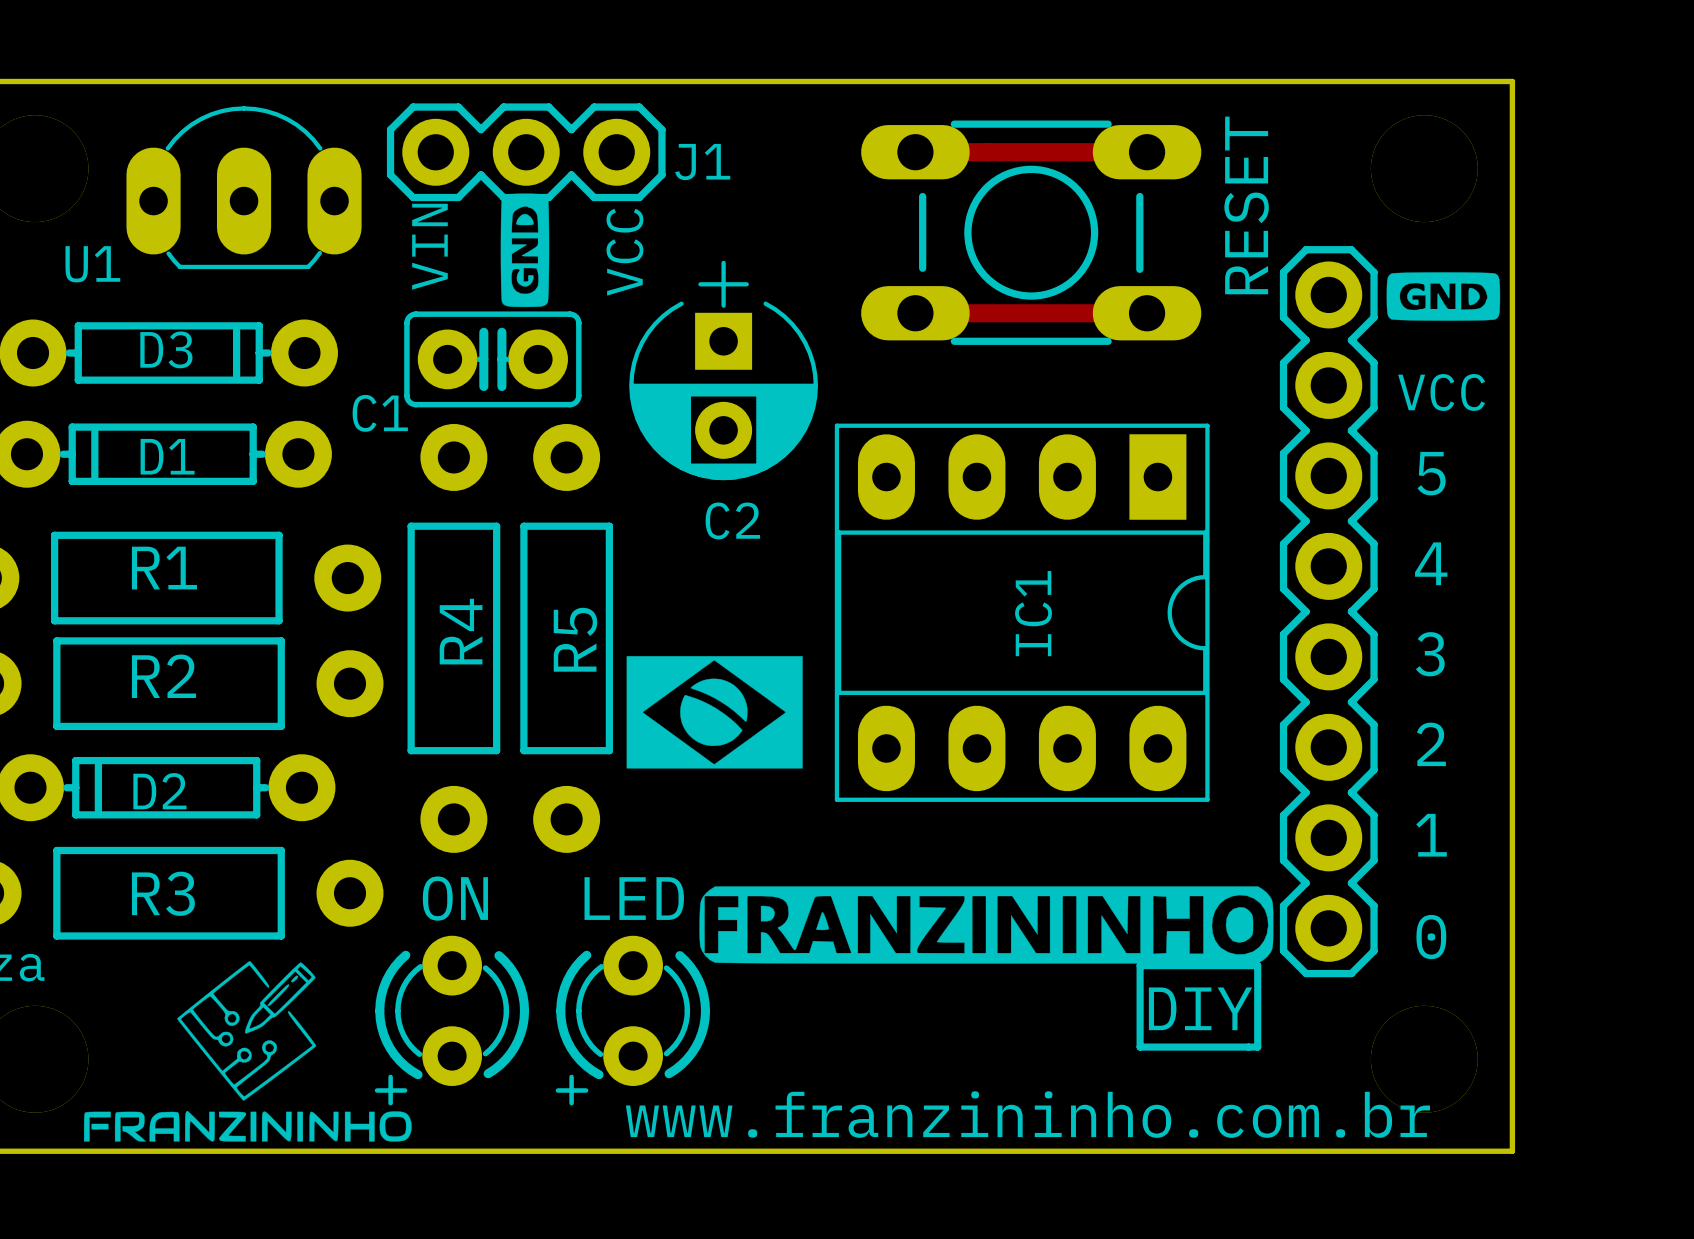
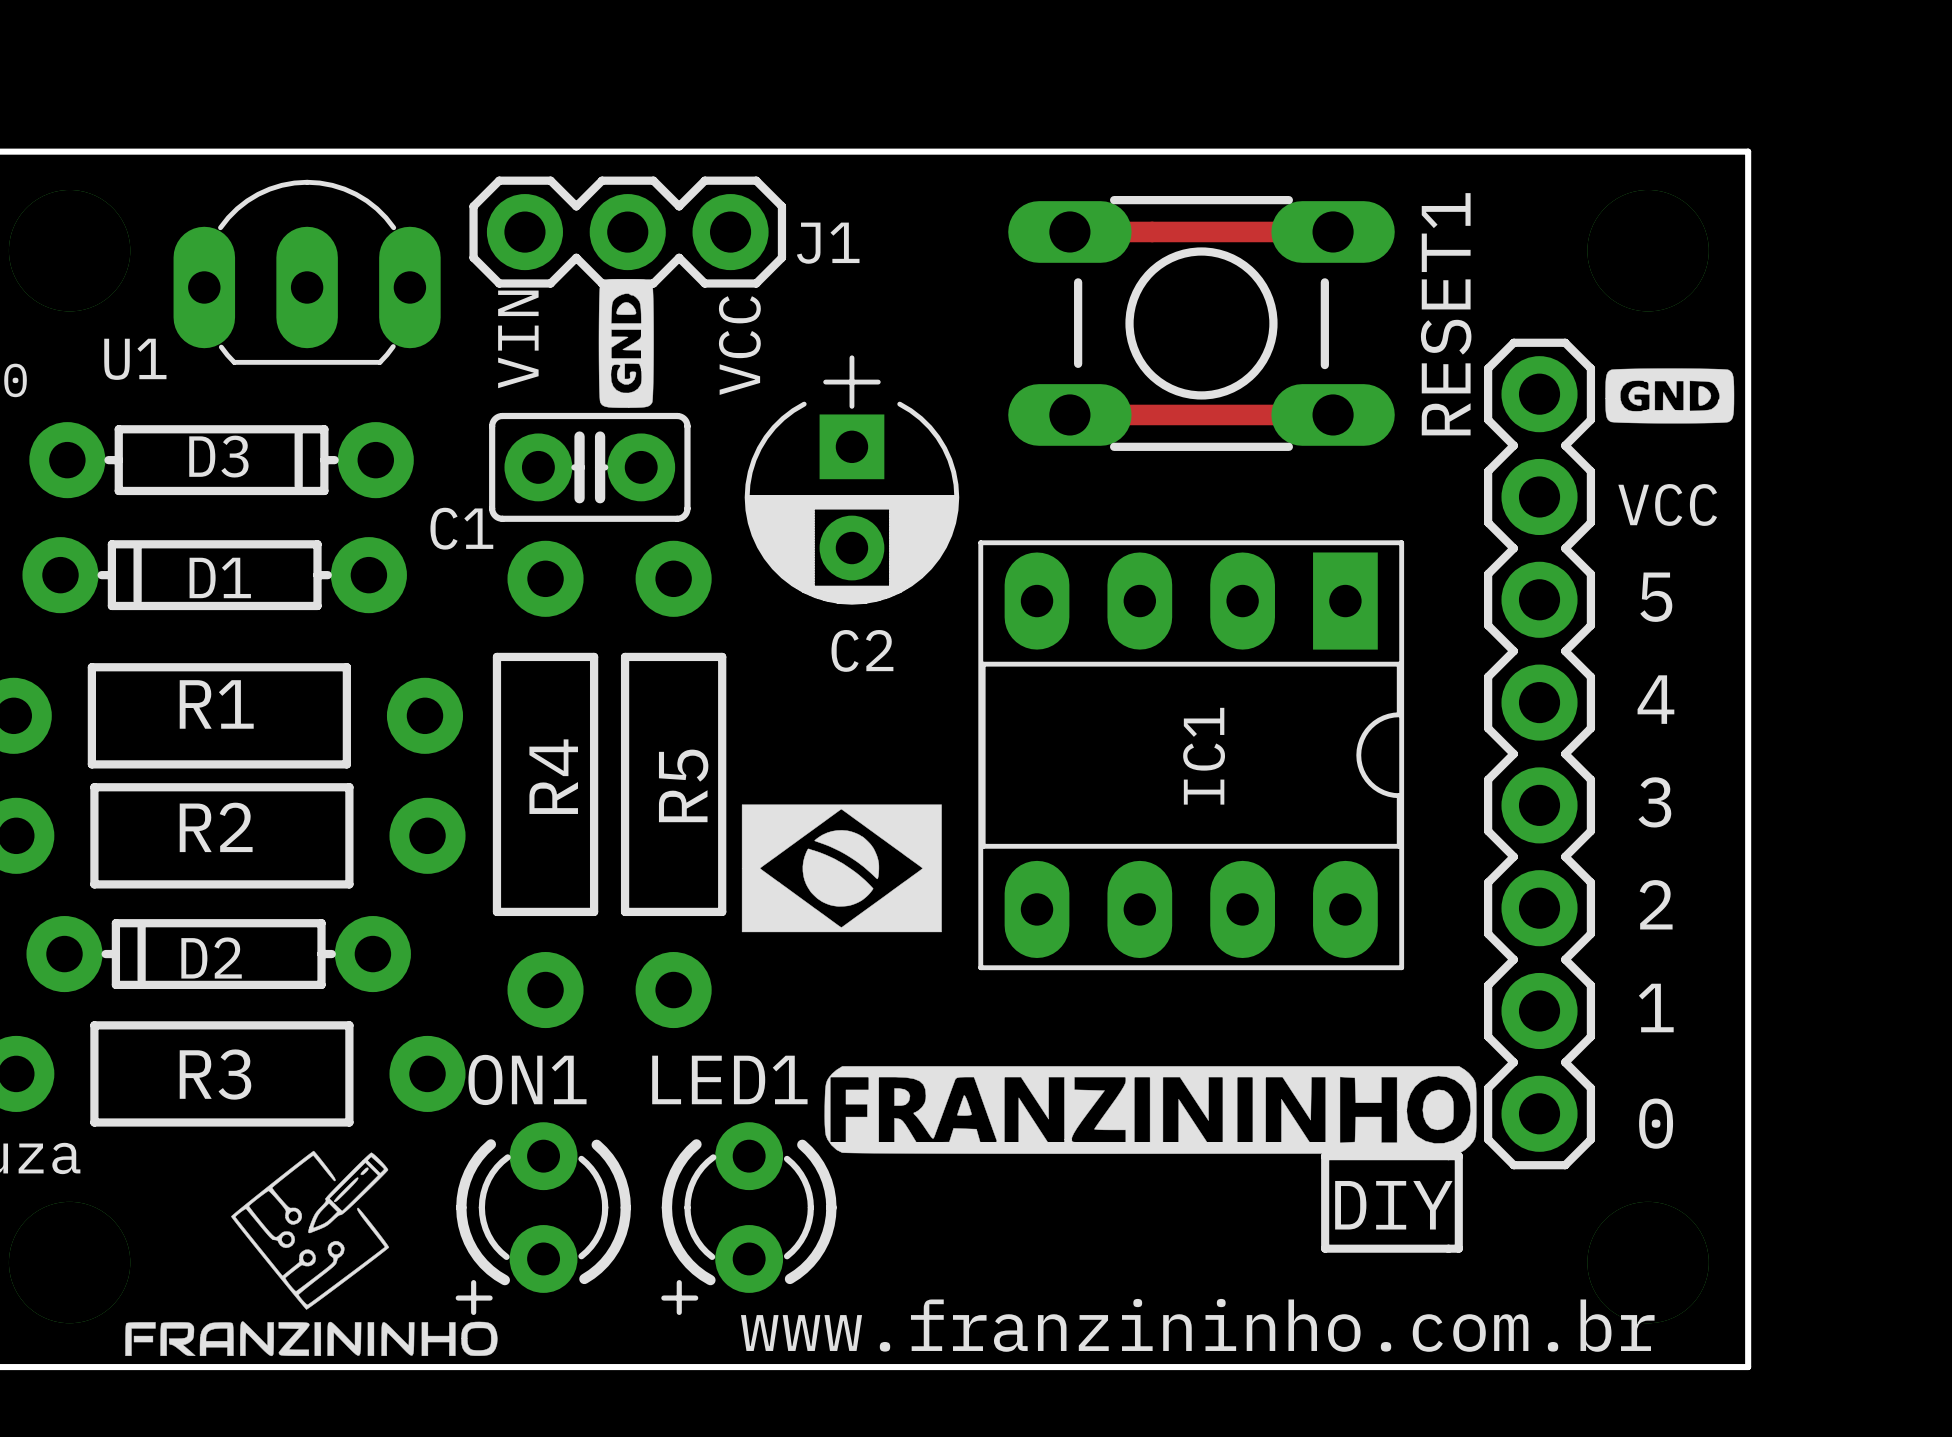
RESET name: RESET (1246, 205) -> RESET1 (1446, 314)
ON name: ON (455, 898) -> ON1 (527, 1079)
LED name: LED (634, 898) -> LED1 (729, 1079)

